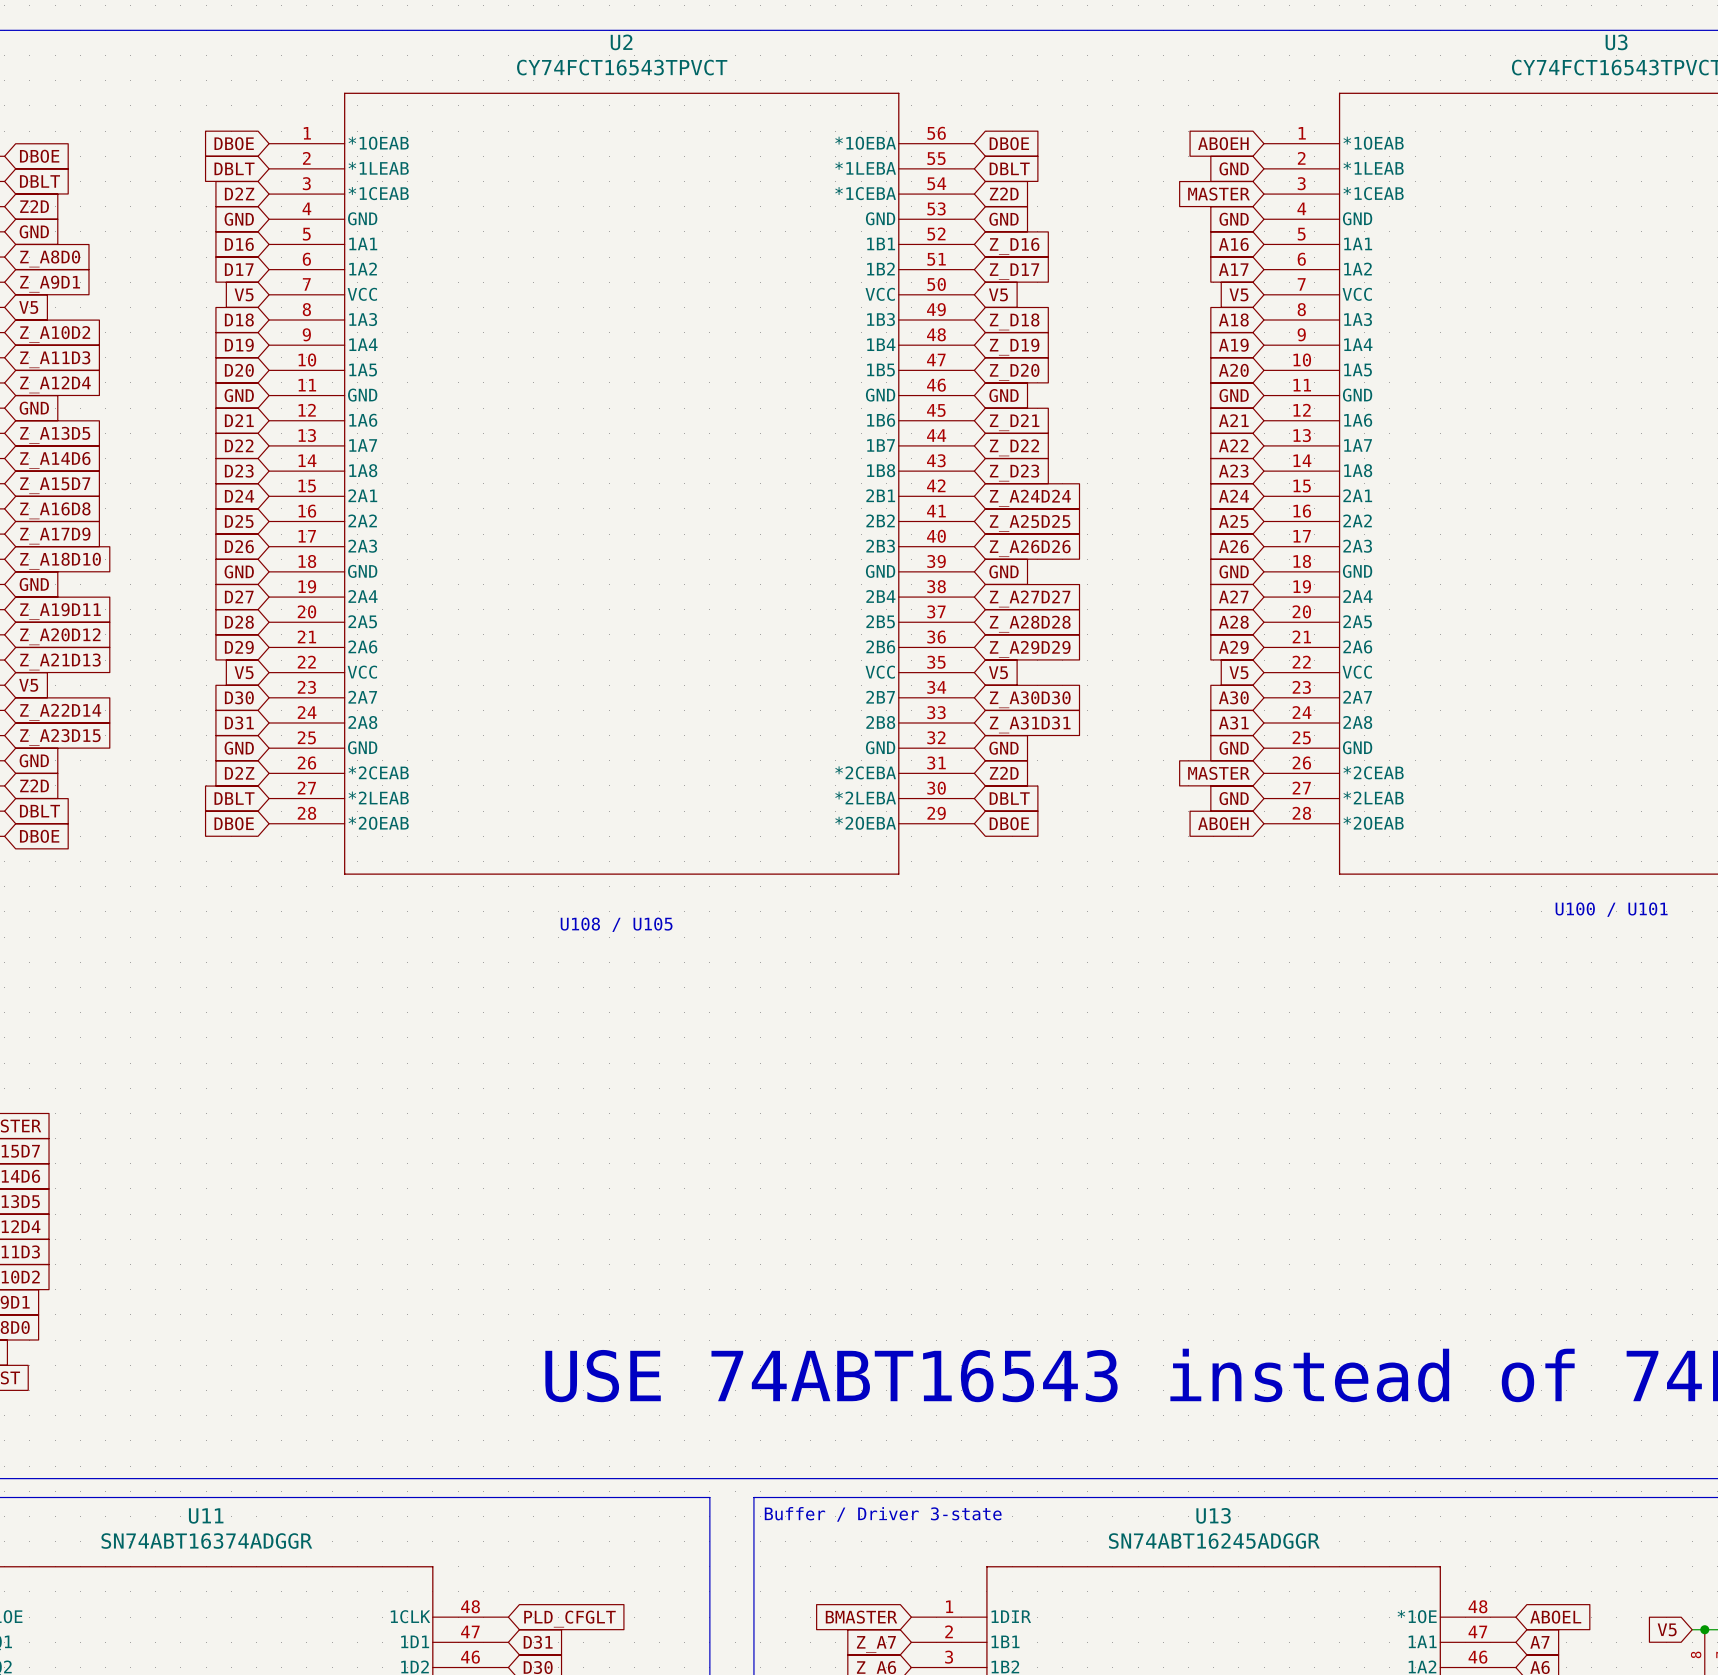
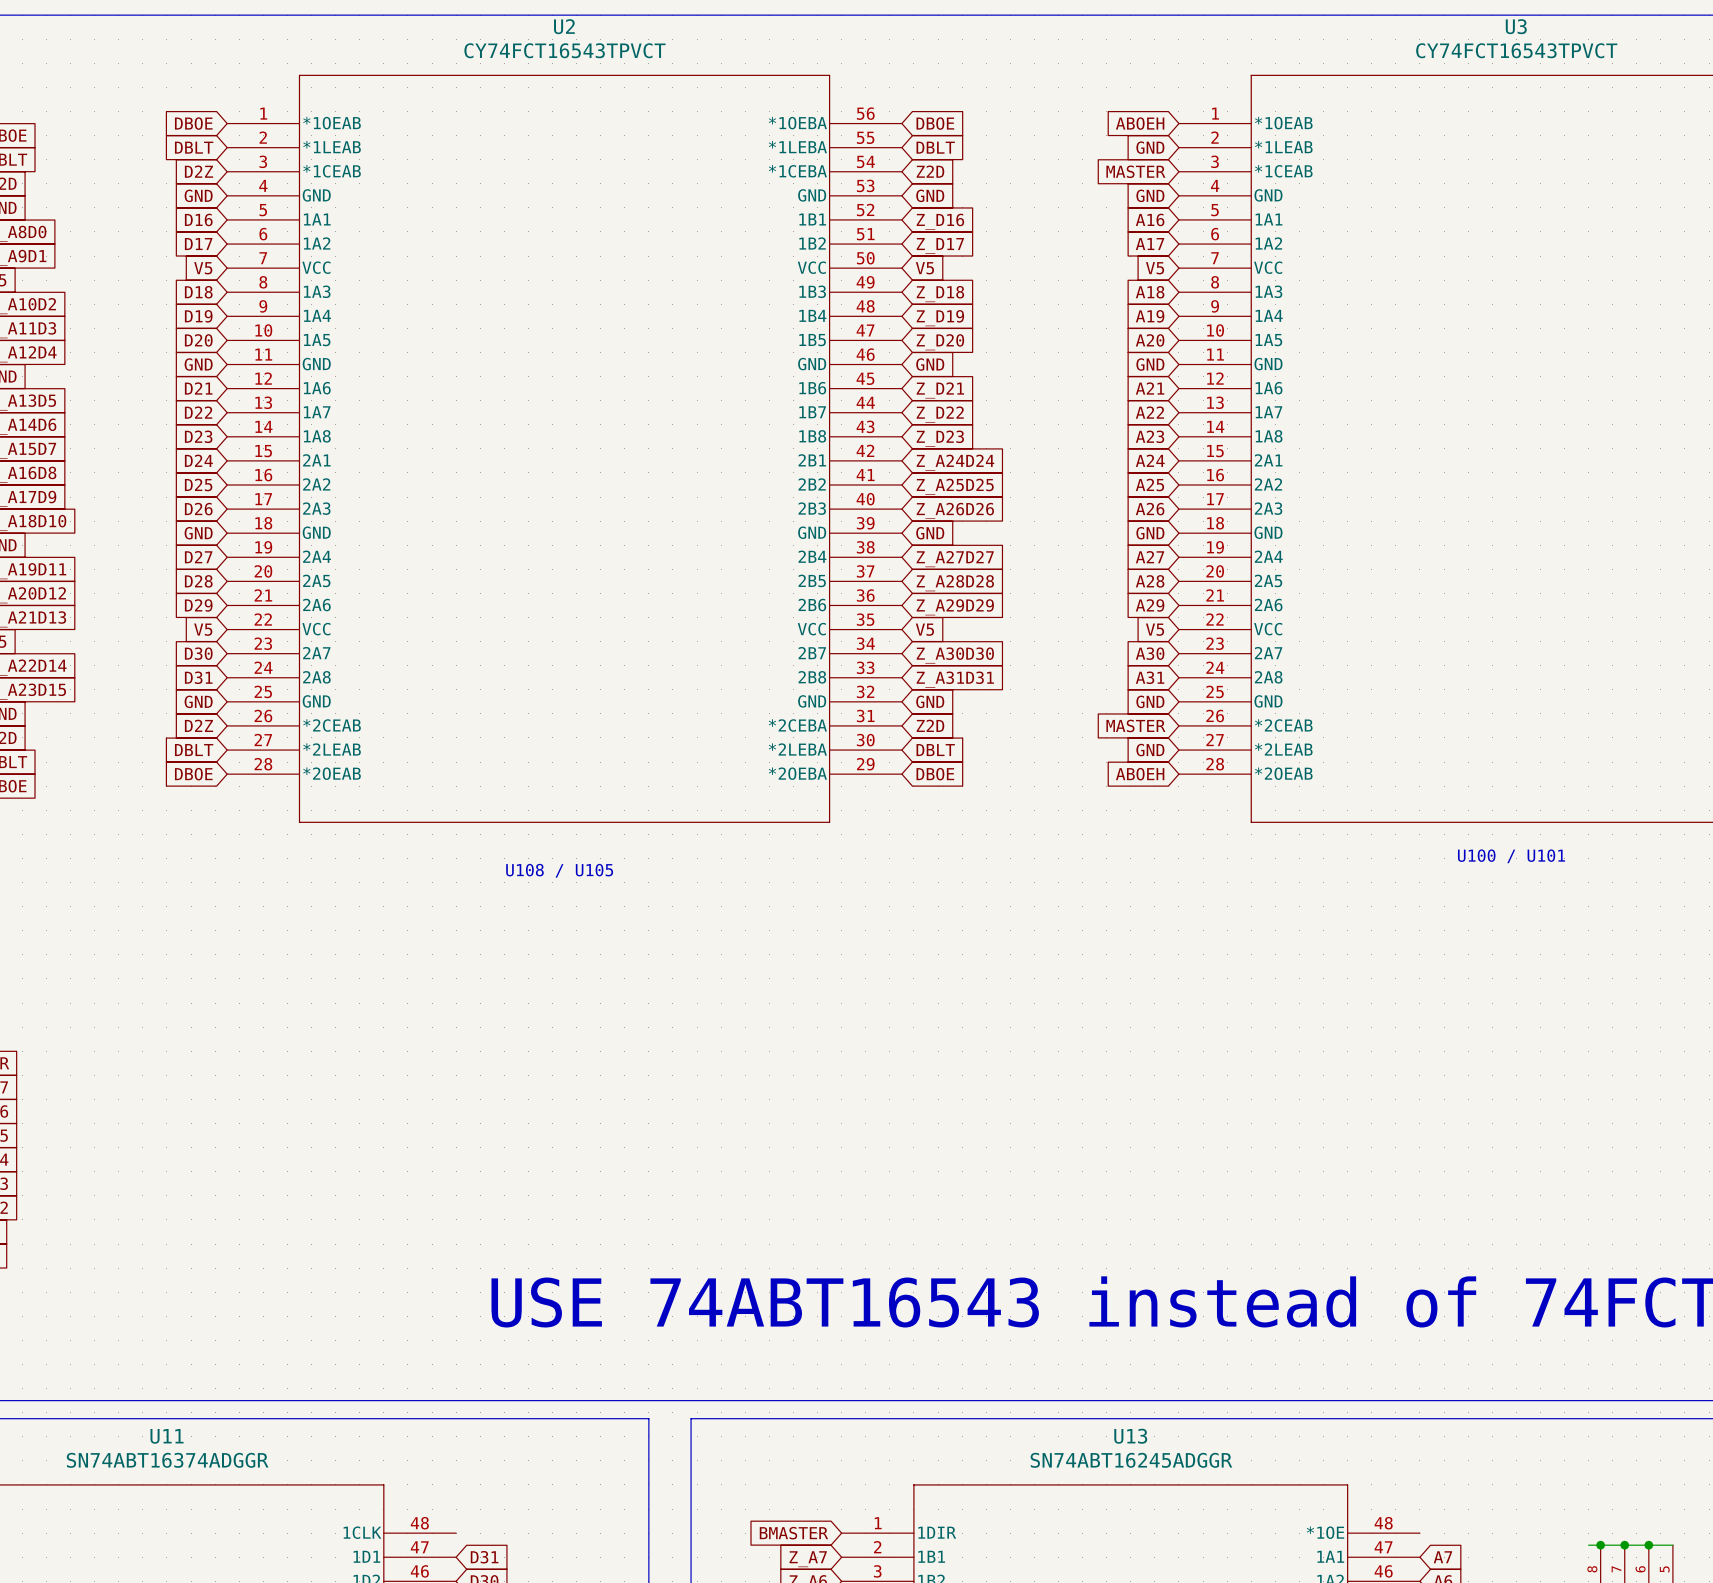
text: Buffer / Driver 3-state (883, 1514) -> none
global label: ABOEL (1555, 1617) -> none
global label: PLD_CFGLT (569, 1619) -> none
global label: V5 (1667, 1629) -> none

